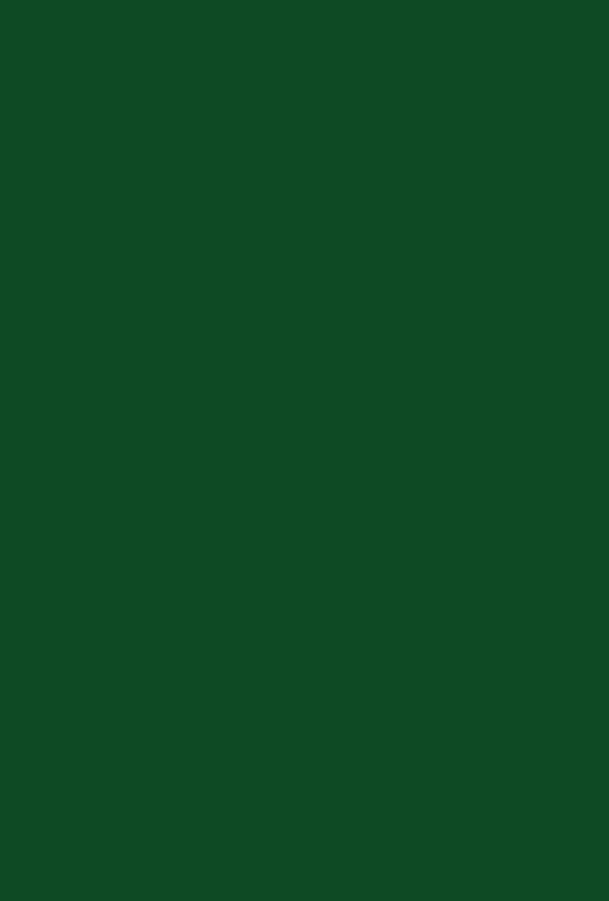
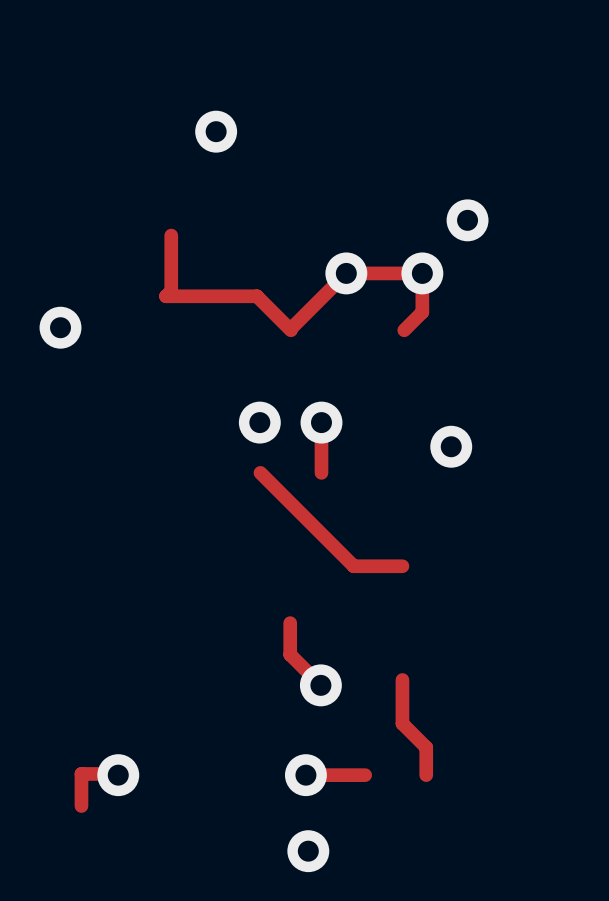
via: none -> (216, 131)
via: none -> (467, 220)
track: none -> (171, 235) (171, 291) (166, 296) (256, 296) (290, 330)
via: none -> (346, 273)
via: none -> (422, 273)
via: none -> (60, 327)
track: none -> (290, 328) (346, 273) (422, 273) (422, 312) (404, 330)
via: none -> (259, 422)
track: none -> (321, 422) (321, 472)
via: none -> (321, 422)
via: none -> (451, 446)
track: none -> (260, 472) (353, 566) (402, 566)
track: none -> (290, 623) (290, 654) (320, 685)
track: none -> (402, 679) (402, 723) (426, 747) (426, 775)
via: none -> (320, 685)
track: none -> (118, 775) (81, 773) (81, 806)
via: none -> (118, 775)
track: none -> (305, 775) (365, 775)
via: none -> (305, 775)
via: none -> (308, 851)

